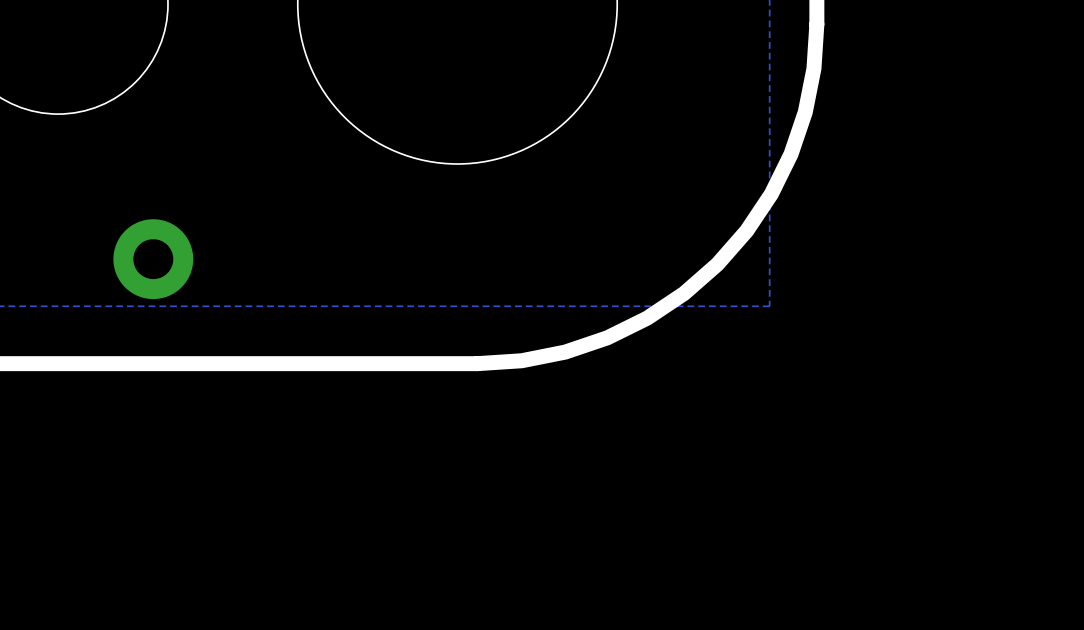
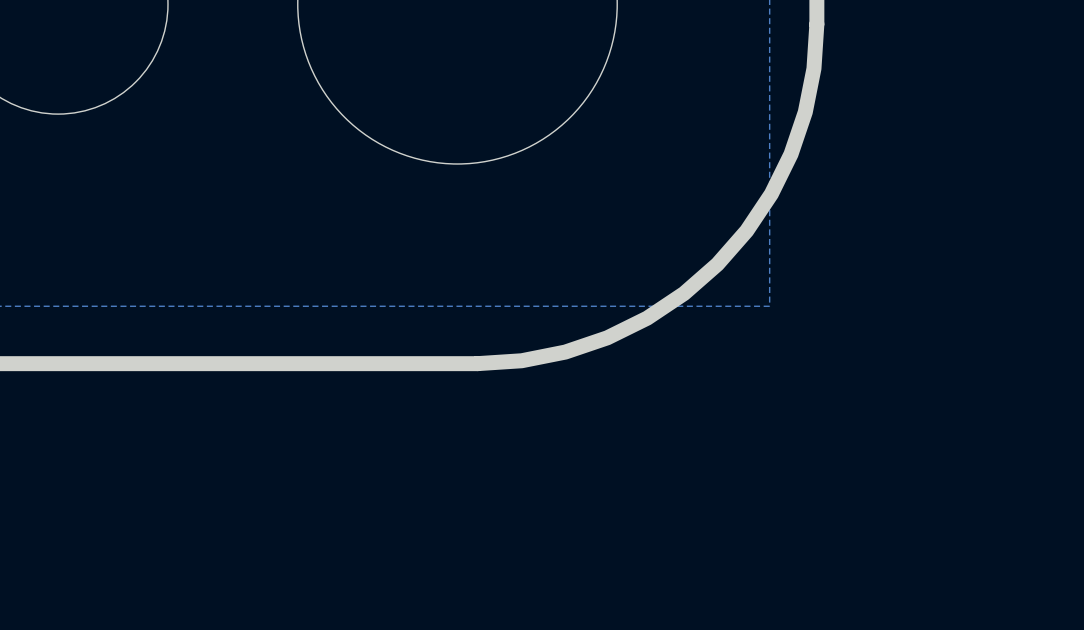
via: (153, 259) -> none

